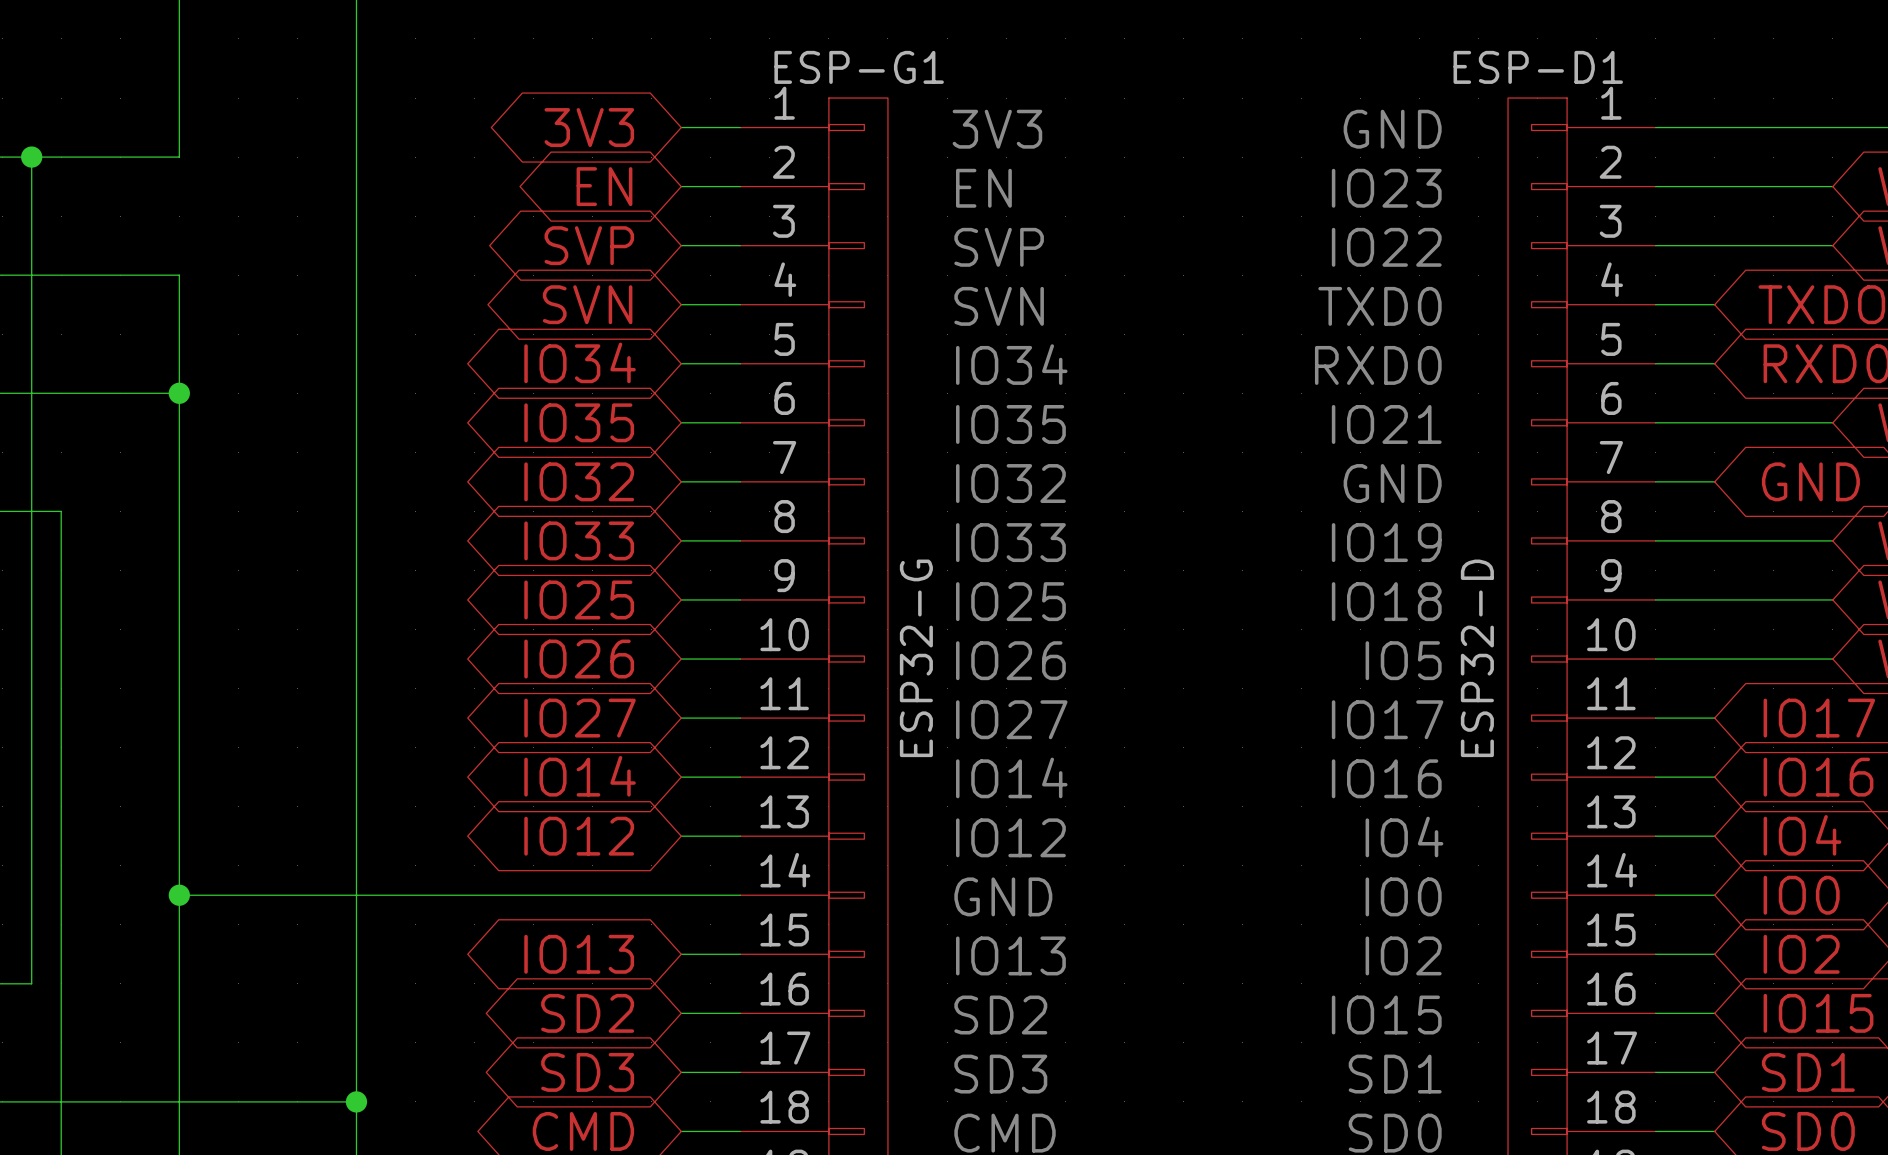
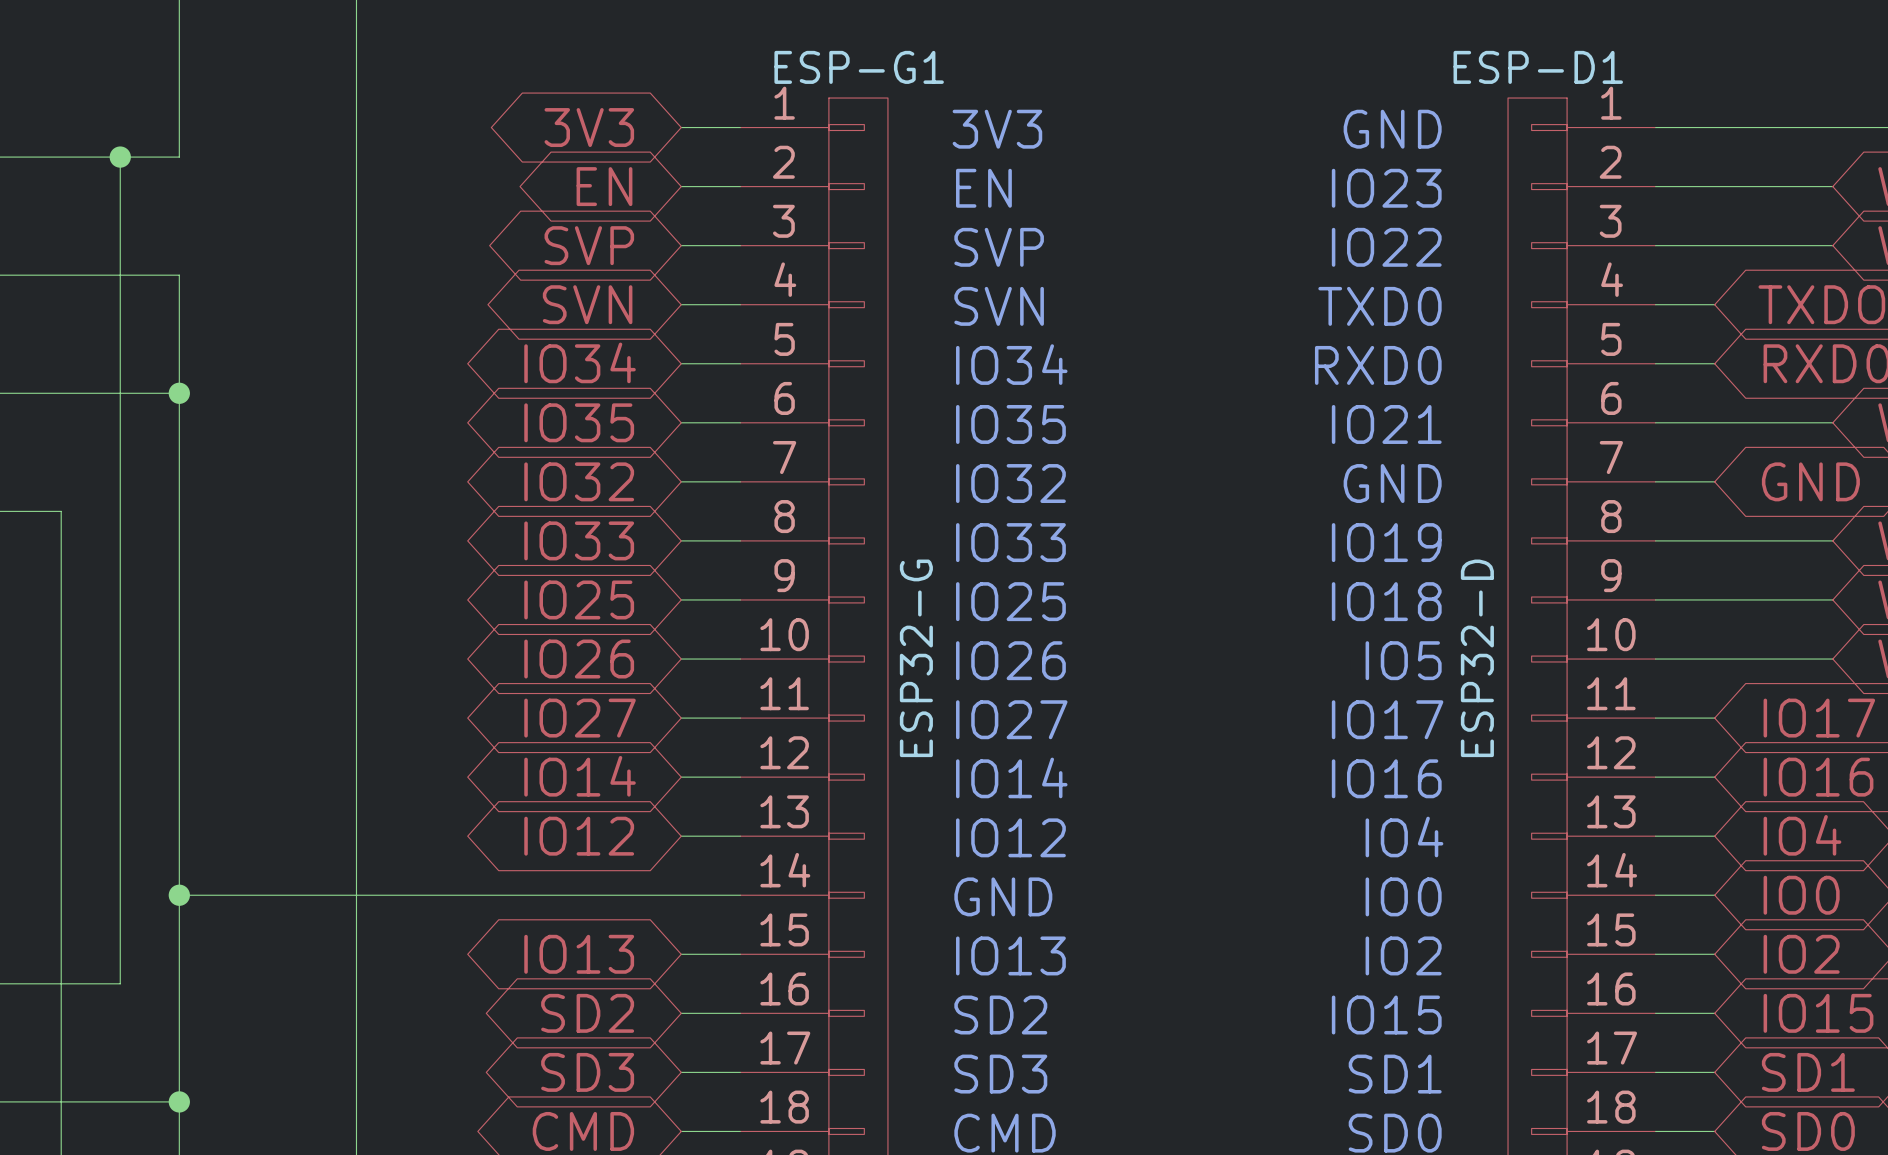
wire: (31, 157) (31, 983) -> (120, 157) (120, 983) (31, 983)
junction position: (31, 157) -> (120, 157)
wire: (179, 1101) (356, 1101) -> none
junction: none -> (179, 1101)
junction: (356, 1101) -> none

